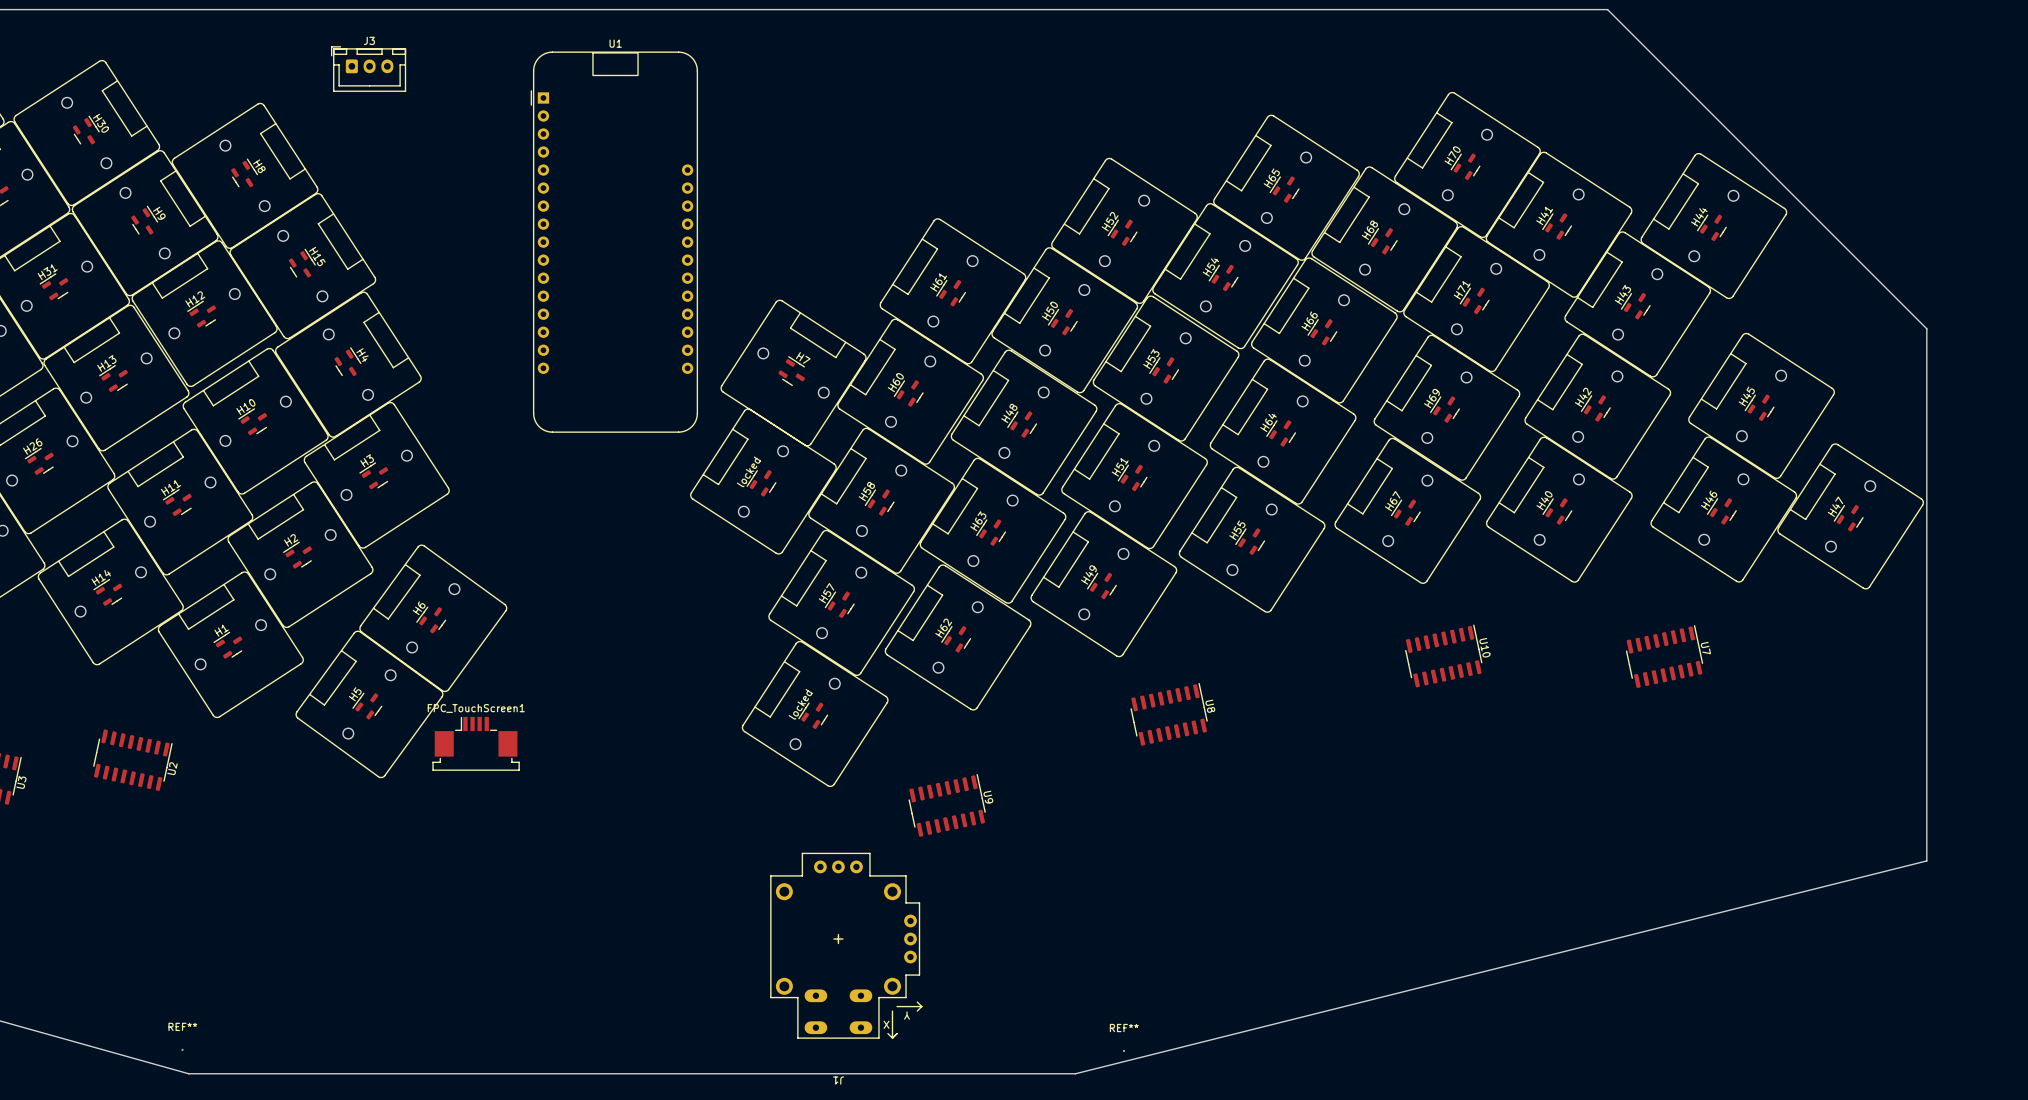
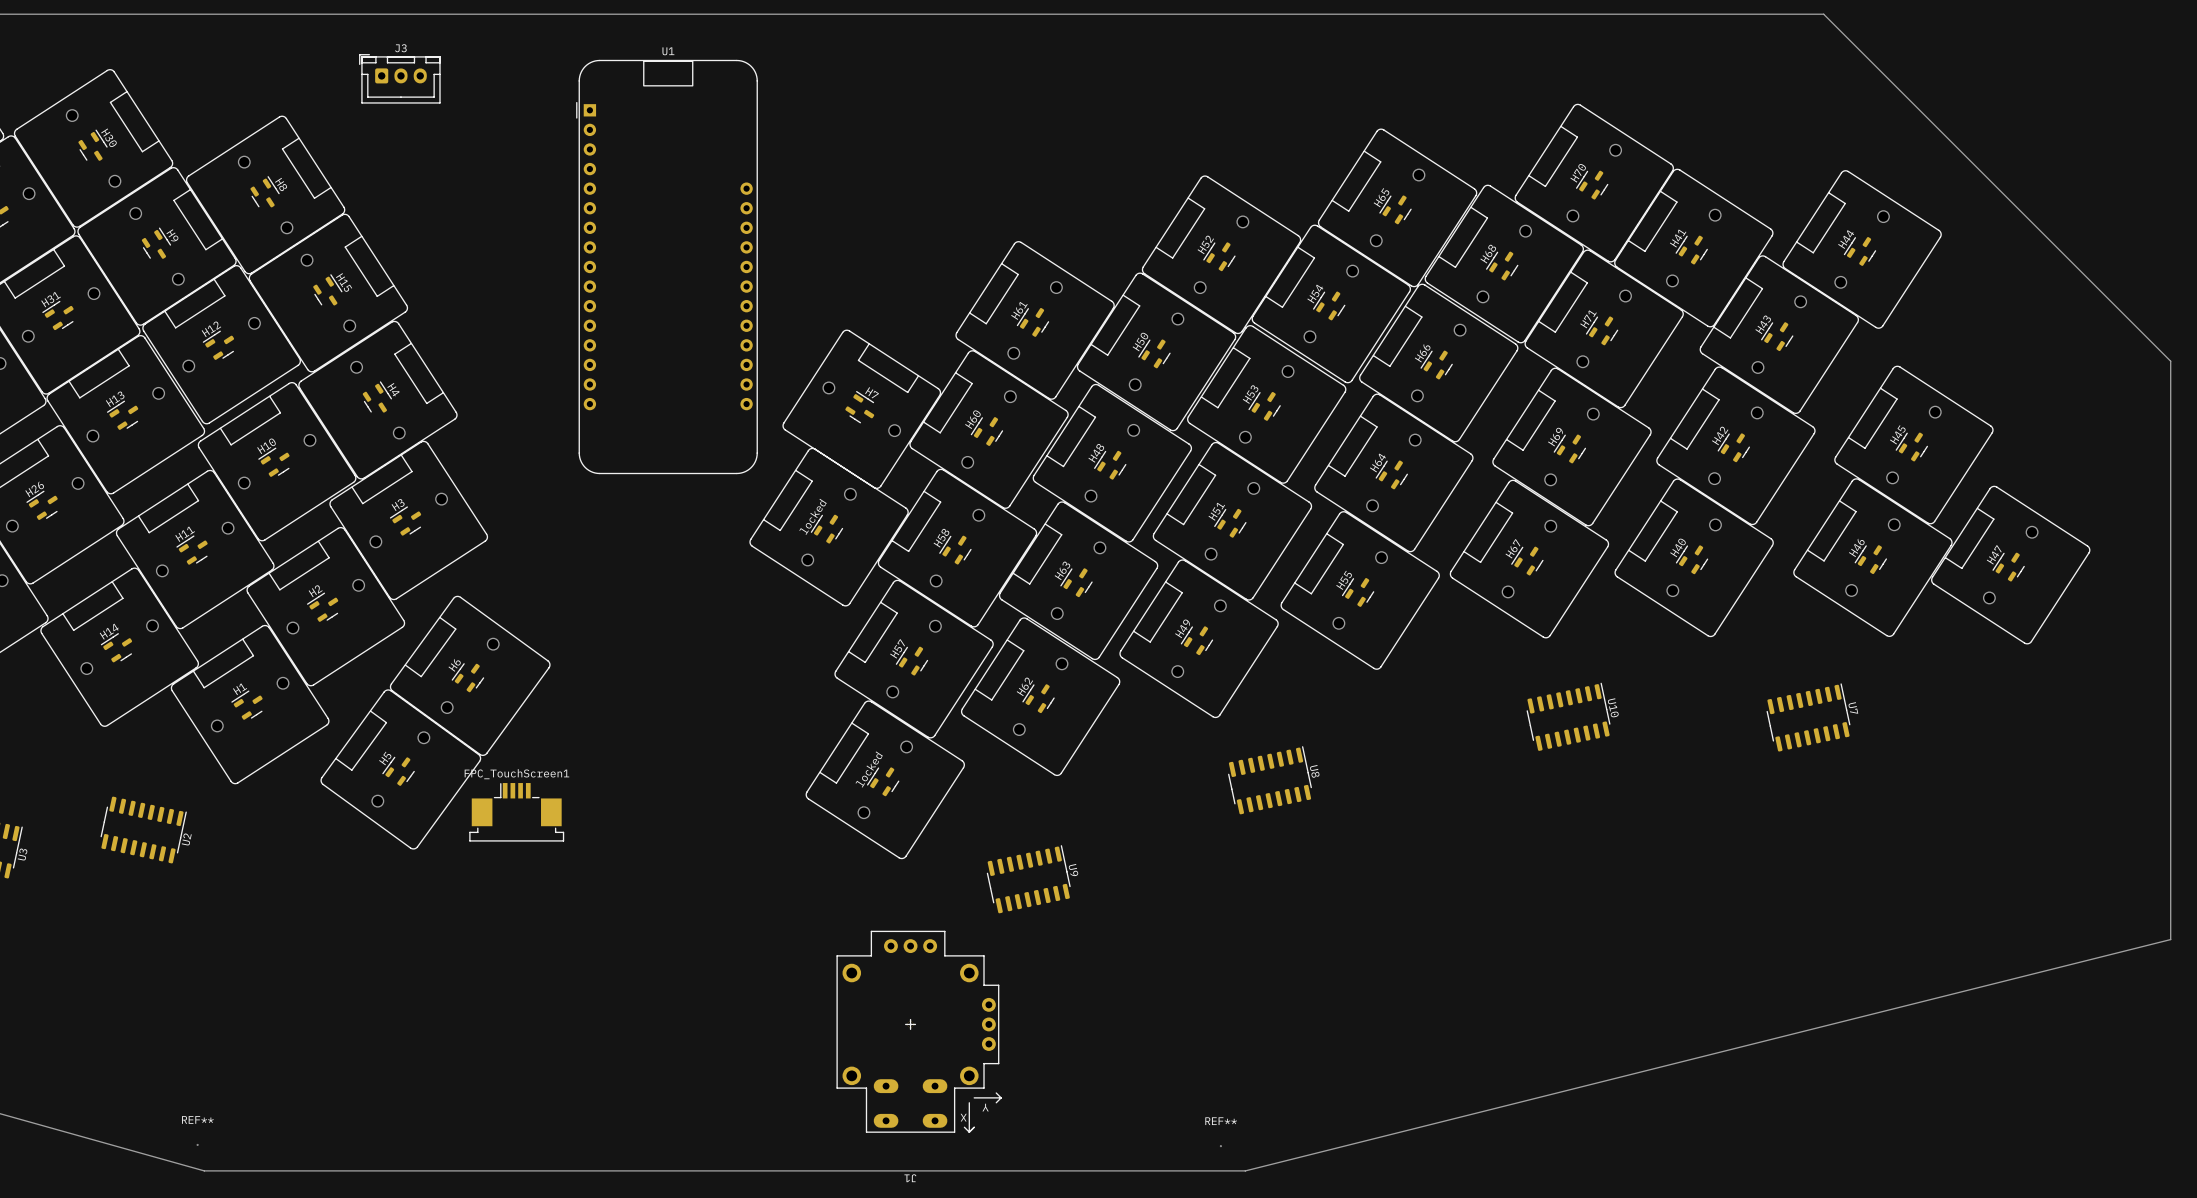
board edge: (1607, 9) (1926, 328) (1926, 860) (1075, 1073) -> (1746, 14) (1823, 14) (2170, 361) (2170, 939) (1245, 1170) (1168, 1170)

